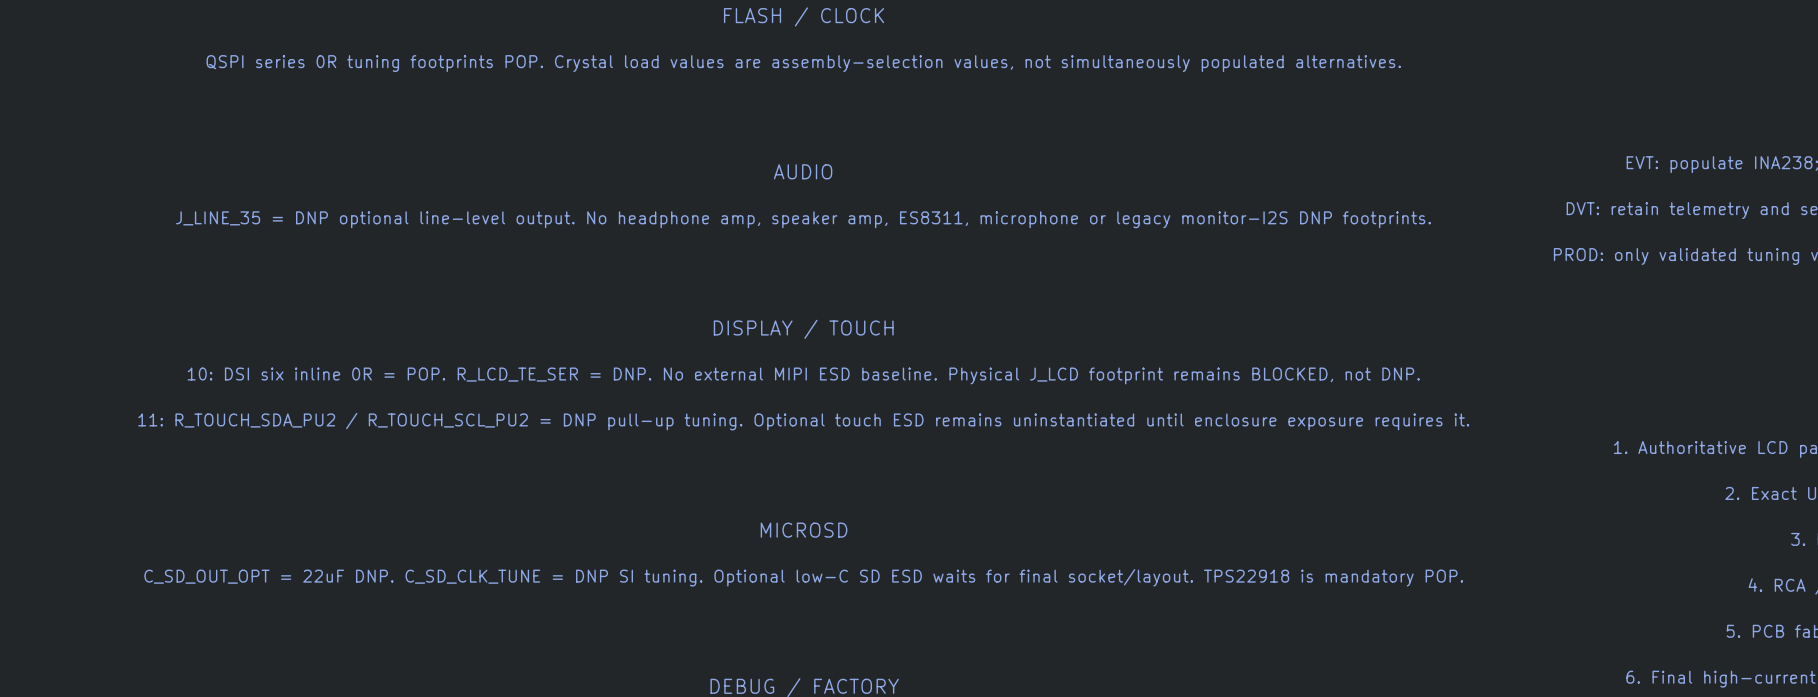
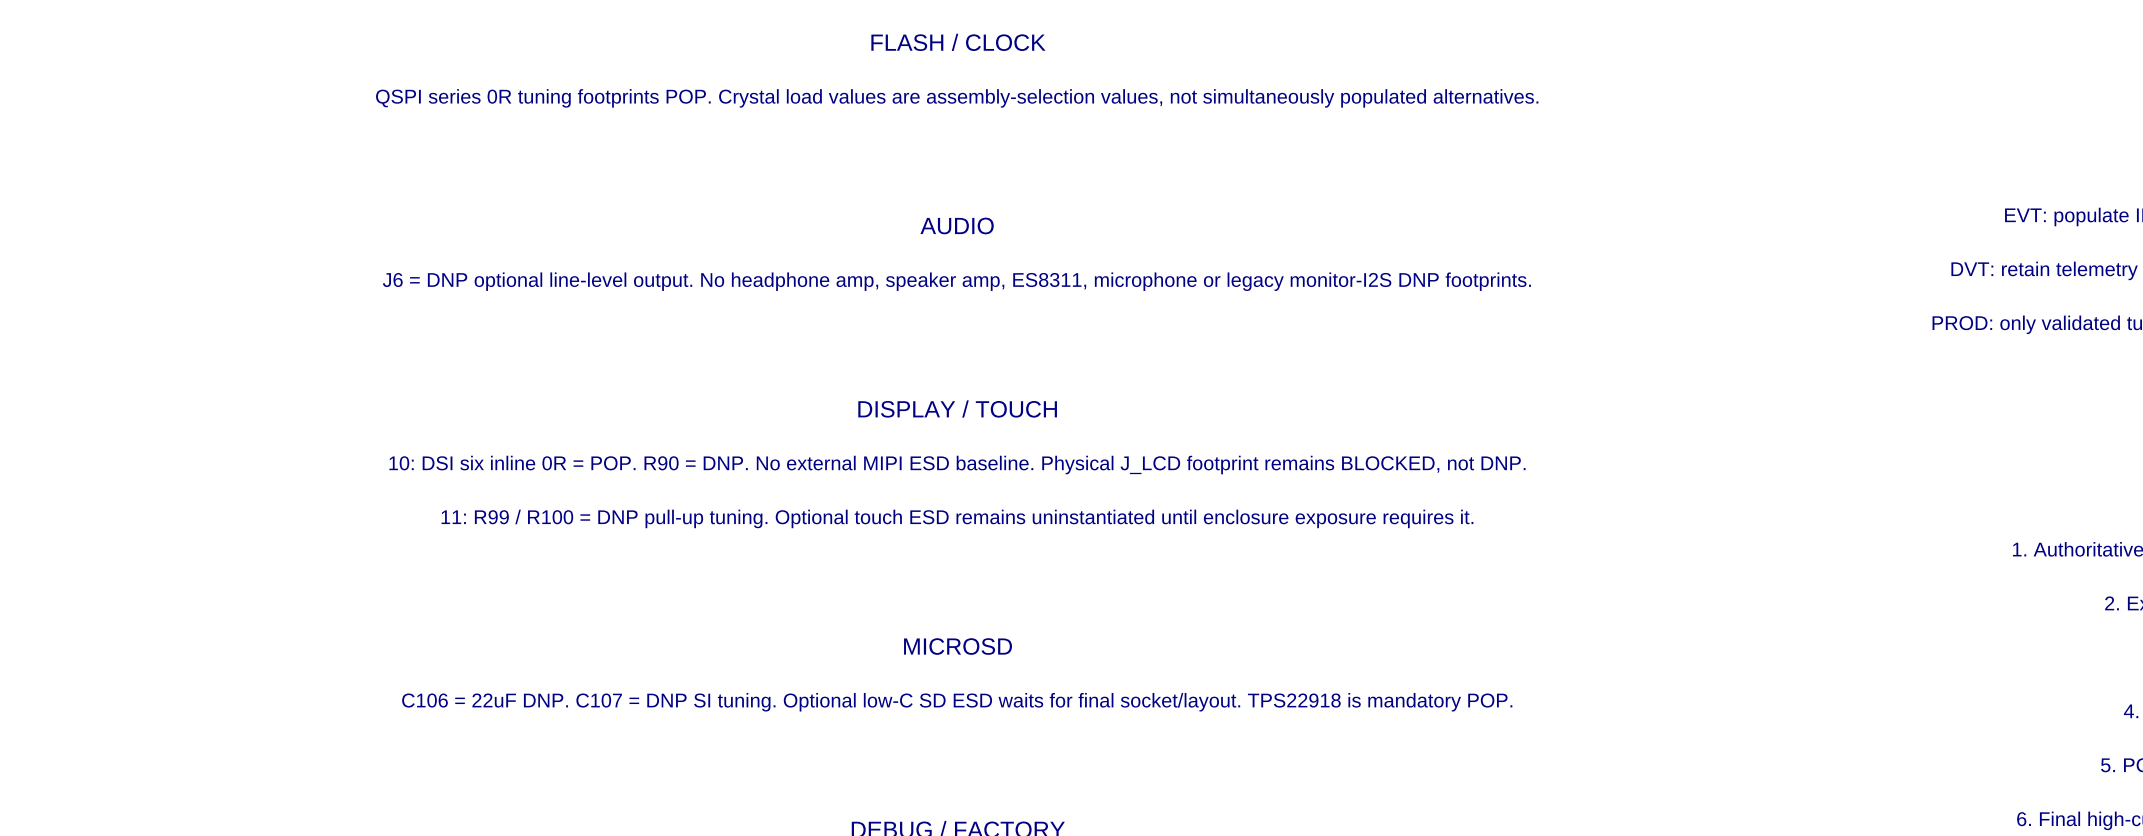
text: J_LINE_35 = DNP optional line-level output. No headphone amp, speaker amp, ES8311, microphone or legacy monitor-I2S DNP footprints. (803, 219) -> J6 = DNP optional line-level output. No headphone amp, speaker amp, ES8311, microphone or legacy monitor-I2S DNP footprints. (956, 281)
text: 10: DSI six inline 0R = POP. R_LCD_TE_SER = DNP. No external MIPI ESD baseline. Physical J_LCD footprint remains BLOCKED, not DNP. (803, 375) -> 10: DSI six inline 0R = POP. R90 = DNP. No external MIPI ESD baseline. Physical J_LCD footprint remains BLOCKED, not DNP. (957, 465)
text: 11: R_TOUCH_SDA_PU2 / R_TOUCH_SCL_PU2 = DNP pull-up tuning. Optional touch ESD remains uninstantiated until enclosure exposure requires it. (803, 421) -> 11: R99 / R100 = DNP pull-up tuning. Optional touch ESD remains uninstantiated until enclosure exposure requires it. (957, 518)
text: C_SD_OUT_OPT = 22uF DNP. C_SD_CLK_TUNE = DNP SI tuning. Optional low-C SD ESD waits for final socket/layout. TPS22918 is mandatory POP. (803, 577) -> C106 = 22uF DNP. C107 = DNP SI tuning. Optional low-C SD ESD waits for final socket/layout. TPS22918 is mandatory POP. (957, 702)

